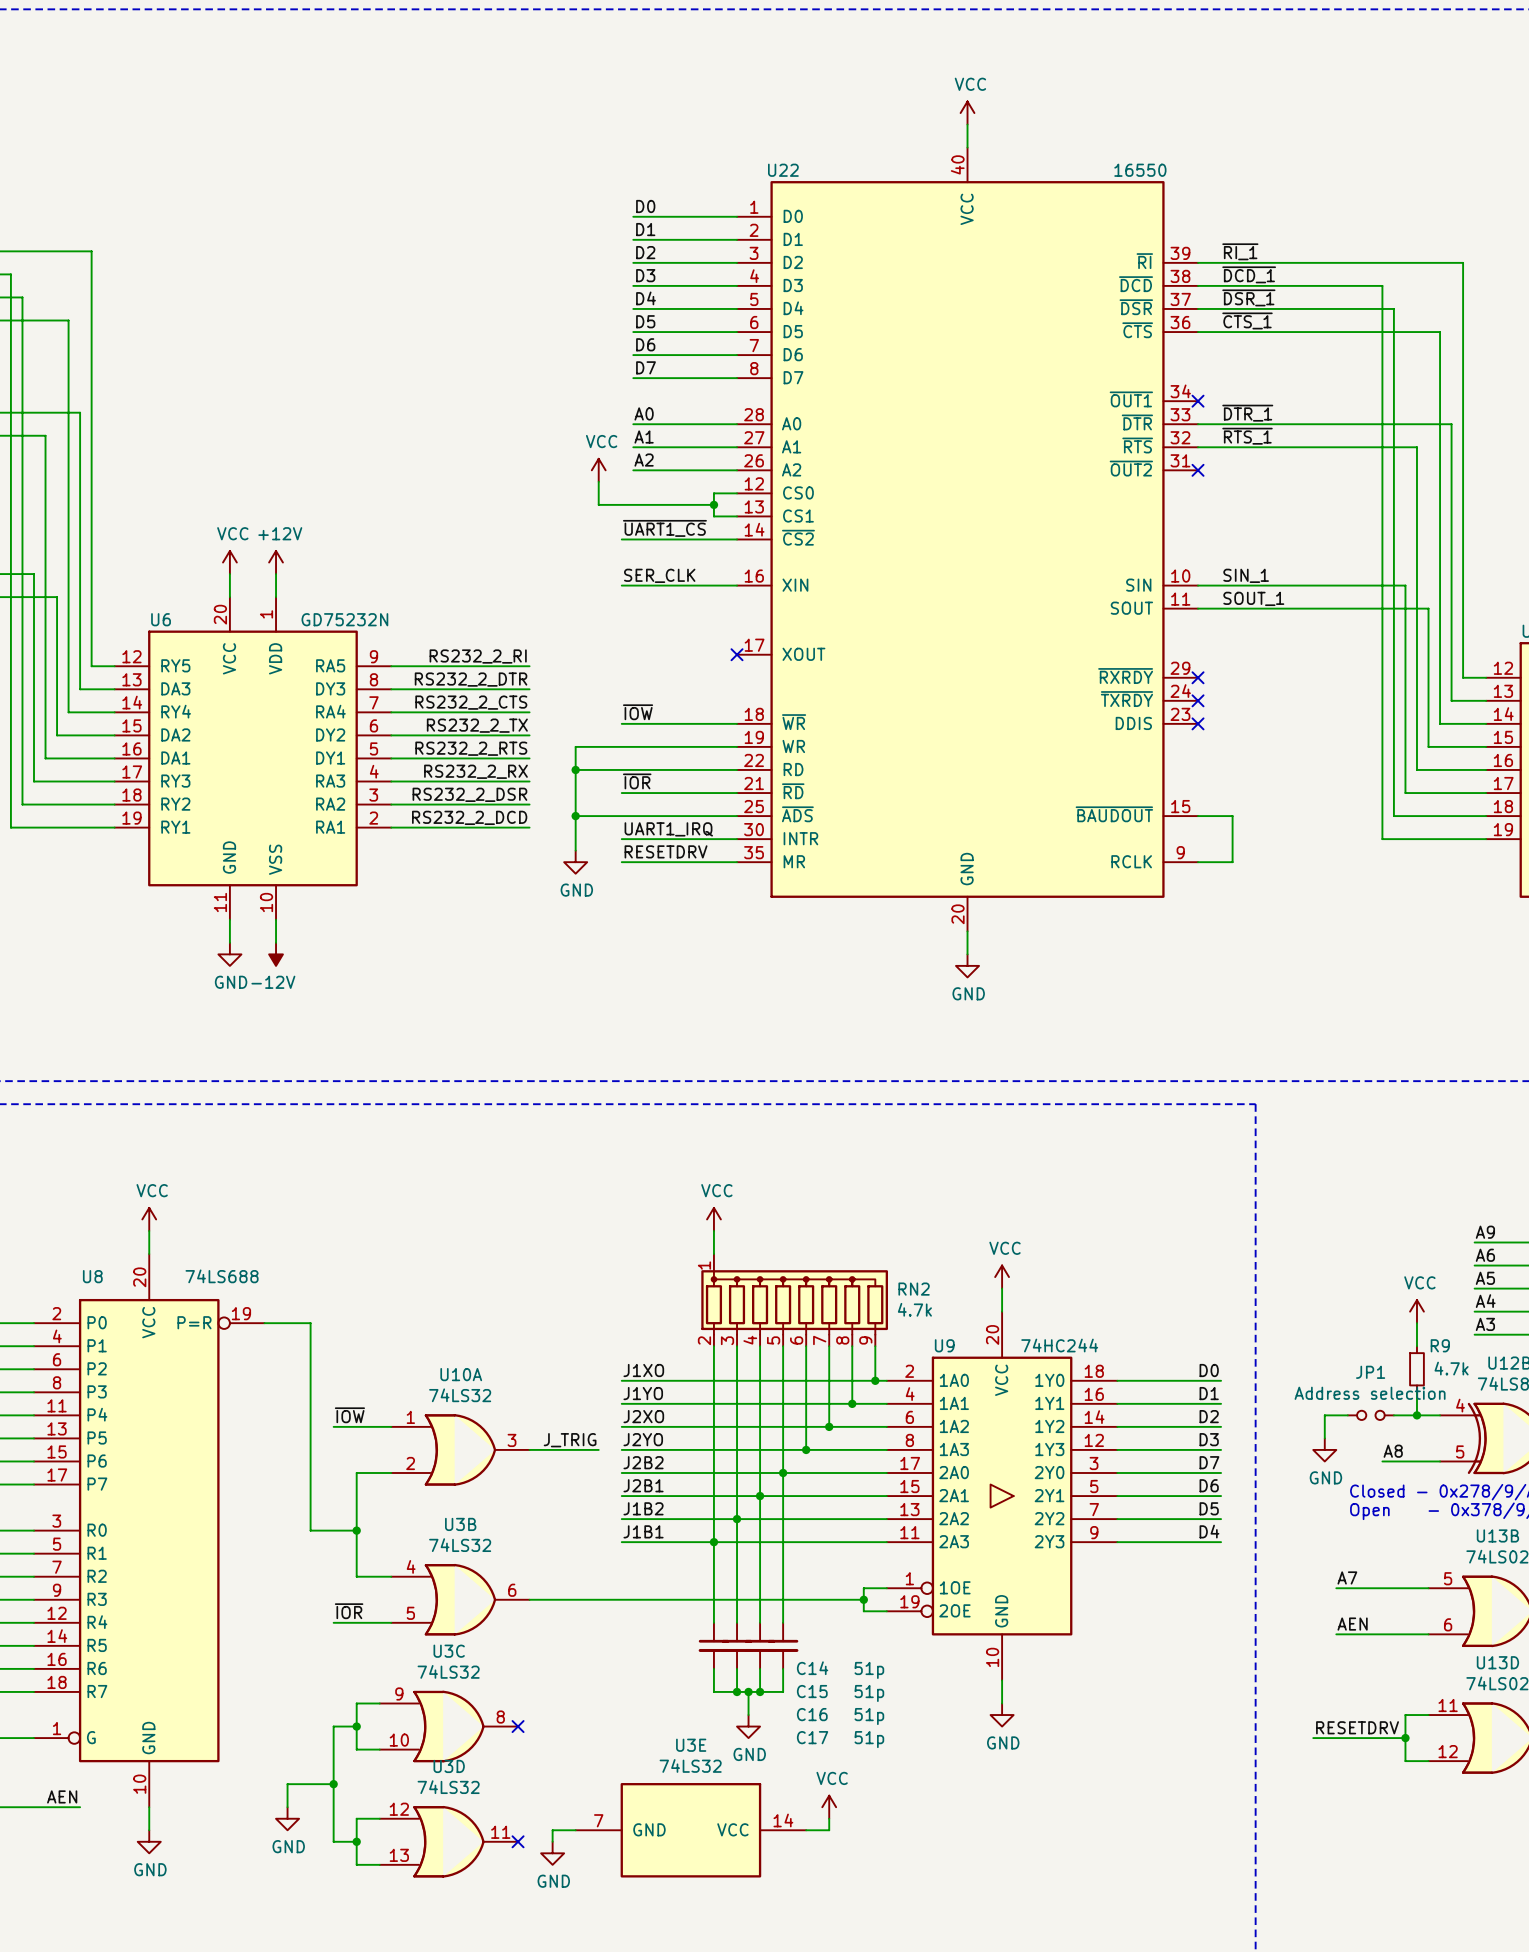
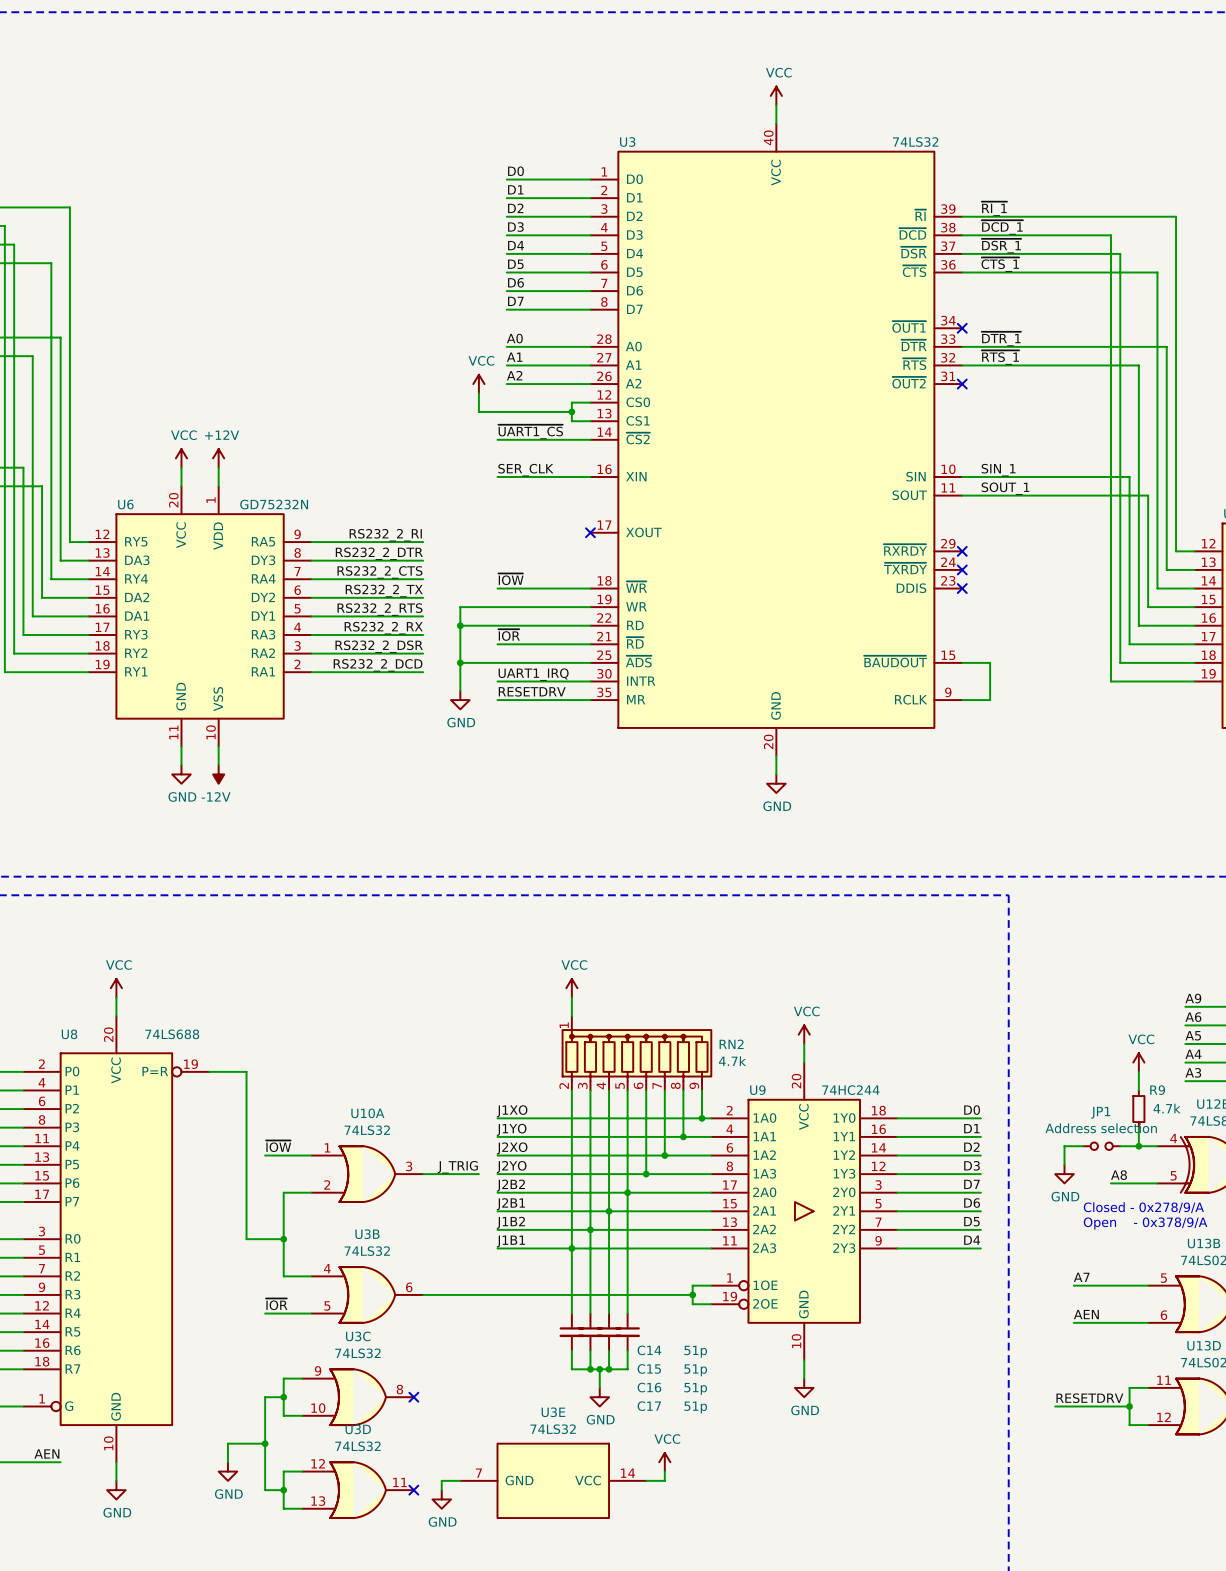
U22 name: U22 (783, 170) -> U3 (627, 142)
U22 value: 16550 (1140, 170) -> 74LS32 (915, 142)

